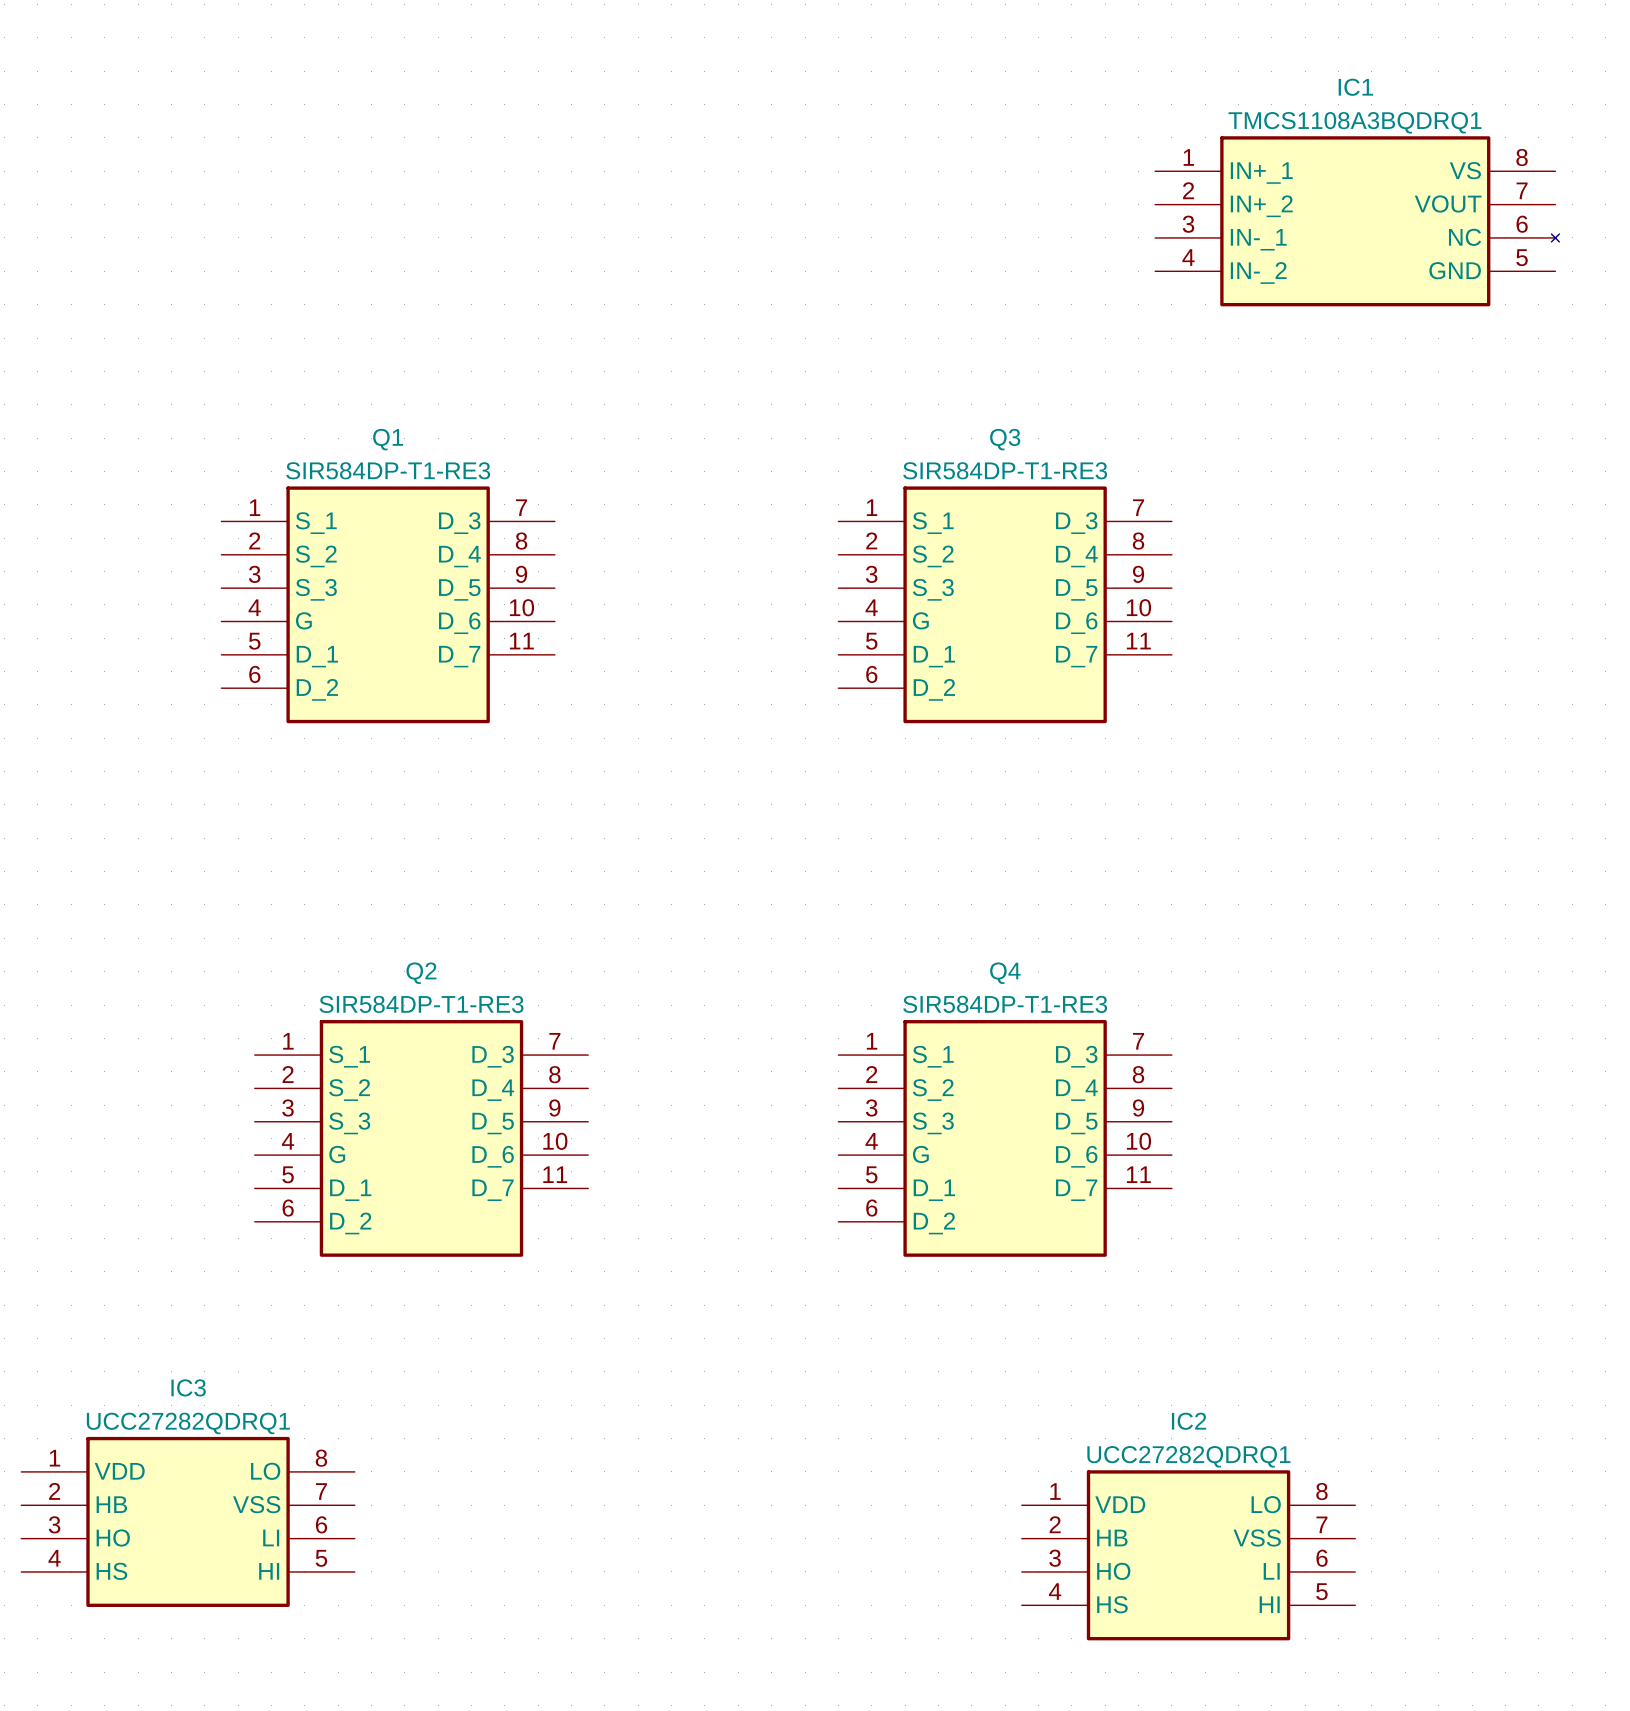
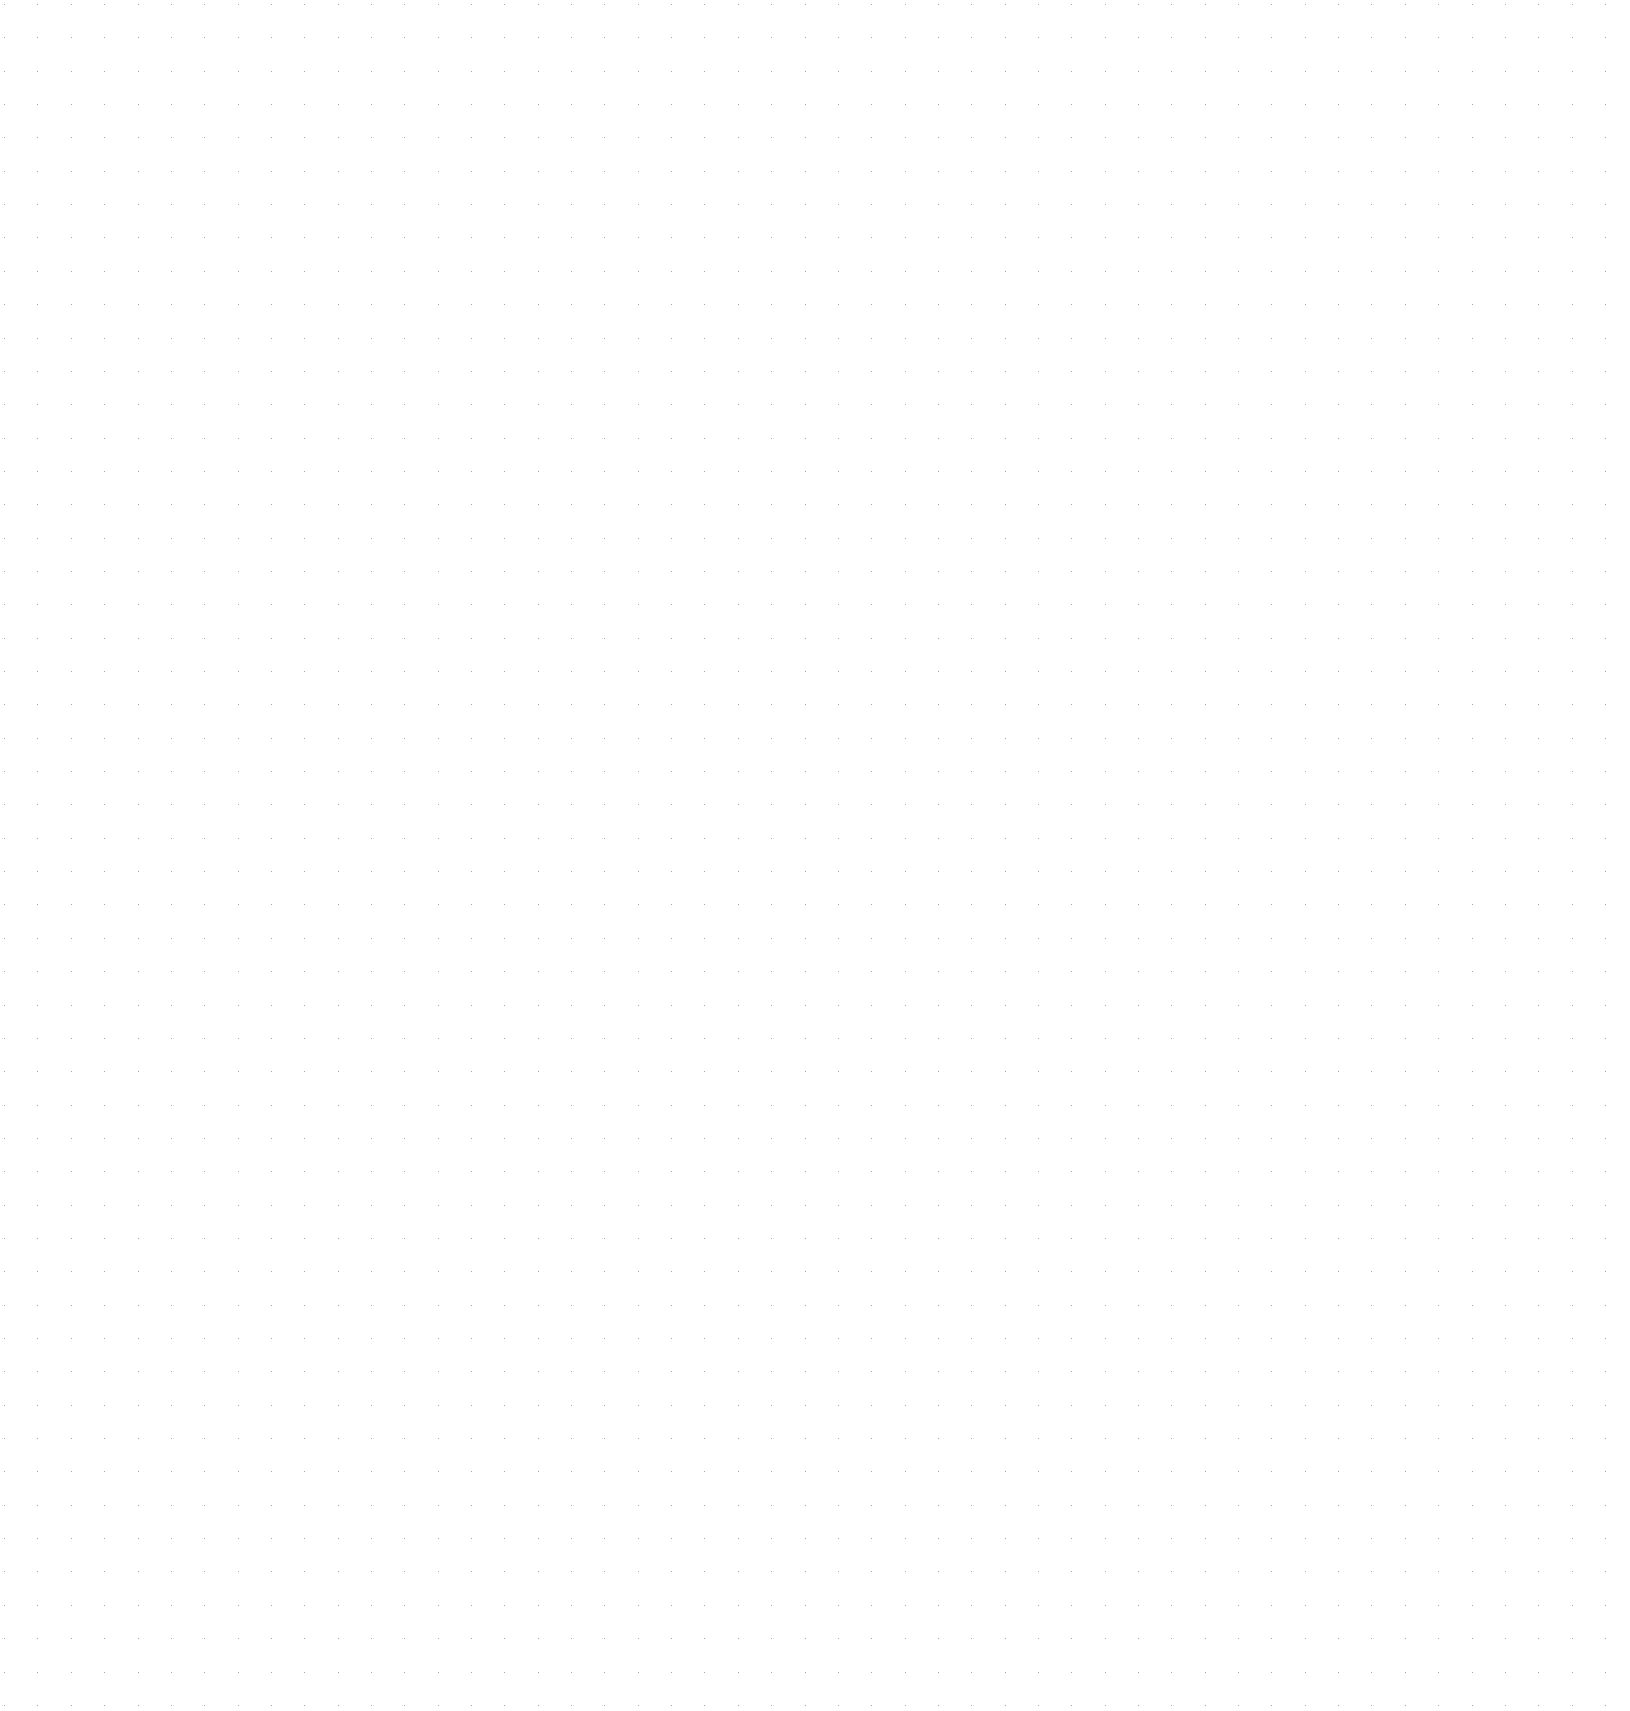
IC1: TMCS1108A3BQDRQ1 (1357, 221) -> none
Q1: SIR584DP-T1-RE3 (388, 604) -> none
Q3: SIR584DP-T1-RE3 (1005, 604) -> none
Q2: SIR584DP-T1-RE3 (421, 1138) -> none
Q4: SIR584DP-T1-RE3 (1005, 1138) -> none
IC3: UCC27282QDRQ1 (188, 1521) -> none
IC2: UCC27282QDRQ1 (1188, 1555) -> none

